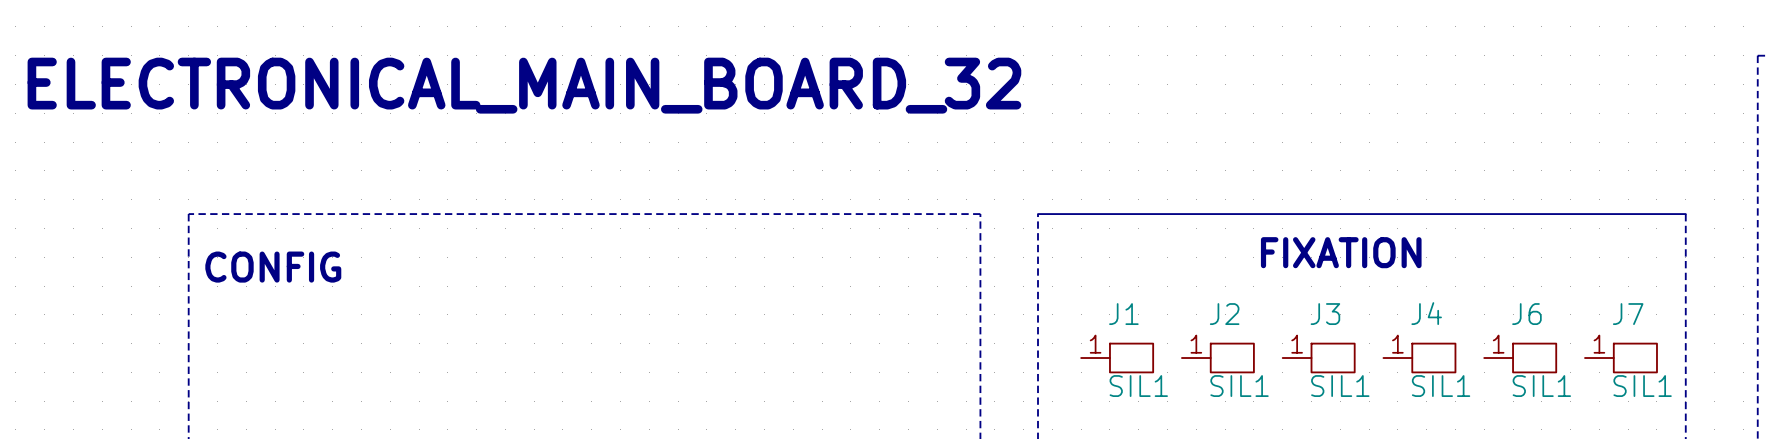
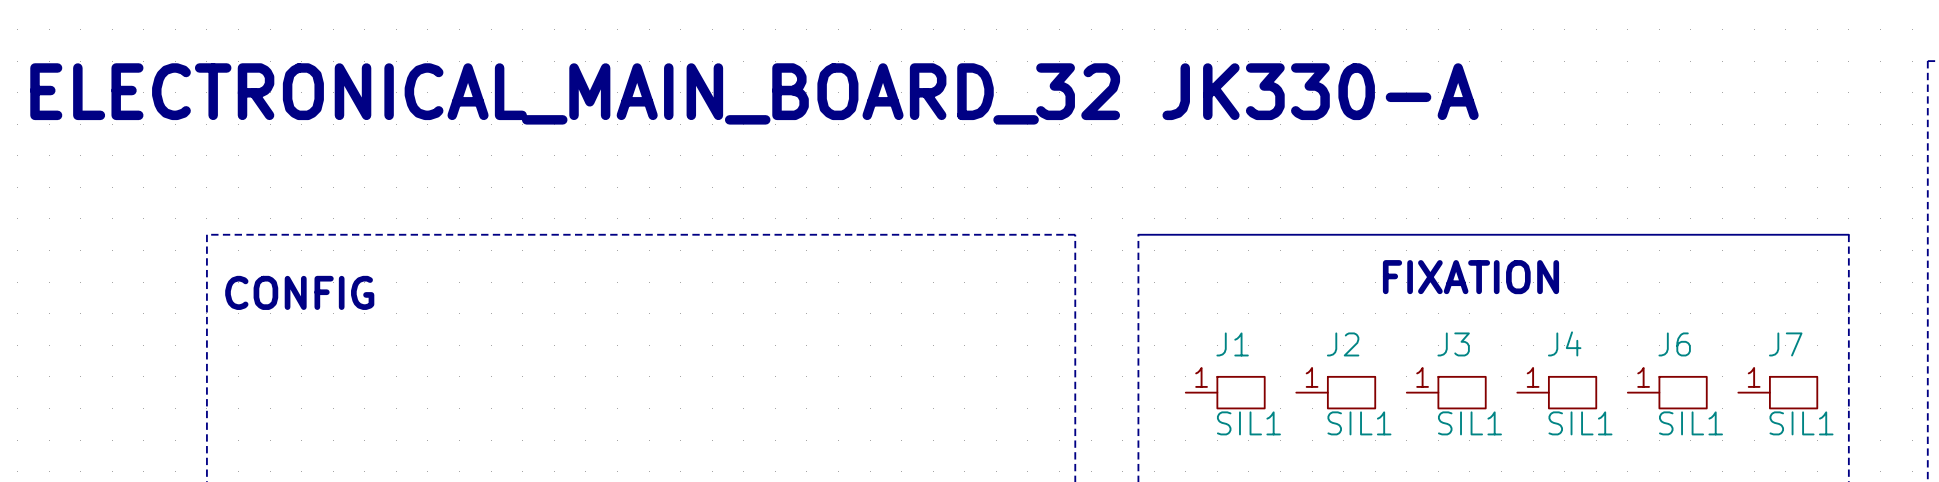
text: ELECTRONICAL_MAIN_BOARD_32 (524, 85) -> ELECTRONICAL_MAIN_BOARD_32 JK330-A (754, 93)

